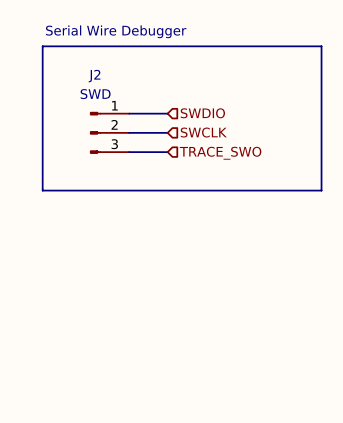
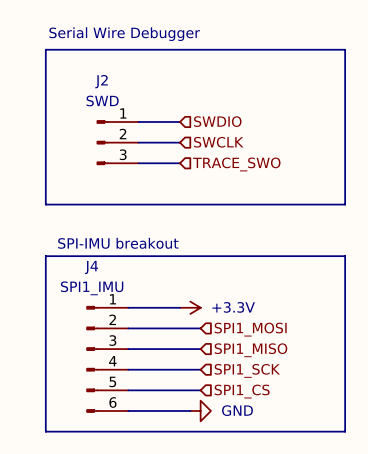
text: none -> SPI-IMU breakout (118, 243)
line: none -> (45, 256) (345, 256) (345, 431) (45, 431) (45, 256)
wire: none -> (128, 307) (179, 307)
power symbol: none -> +3.3V (190, 307)
wire: none -> (128, 328) (200, 328)
hierarchical label: none -> SPI1_MOSI (250, 329)
wire: none -> (128, 349) (200, 349)
hierarchical label: none -> SPI1_MISO (250, 350)
J4: none -> SPI1_IMU (107, 359)
wire: none -> (128, 369) (200, 369)
hierarchical label: none -> SPI1_SCK (247, 370)
wire: none -> (128, 390) (200, 390)
hierarchical label: none -> SPI1_CS (242, 391)
wire: none -> (128, 411) (190, 411)
power symbol: none -> GND (200, 411)

